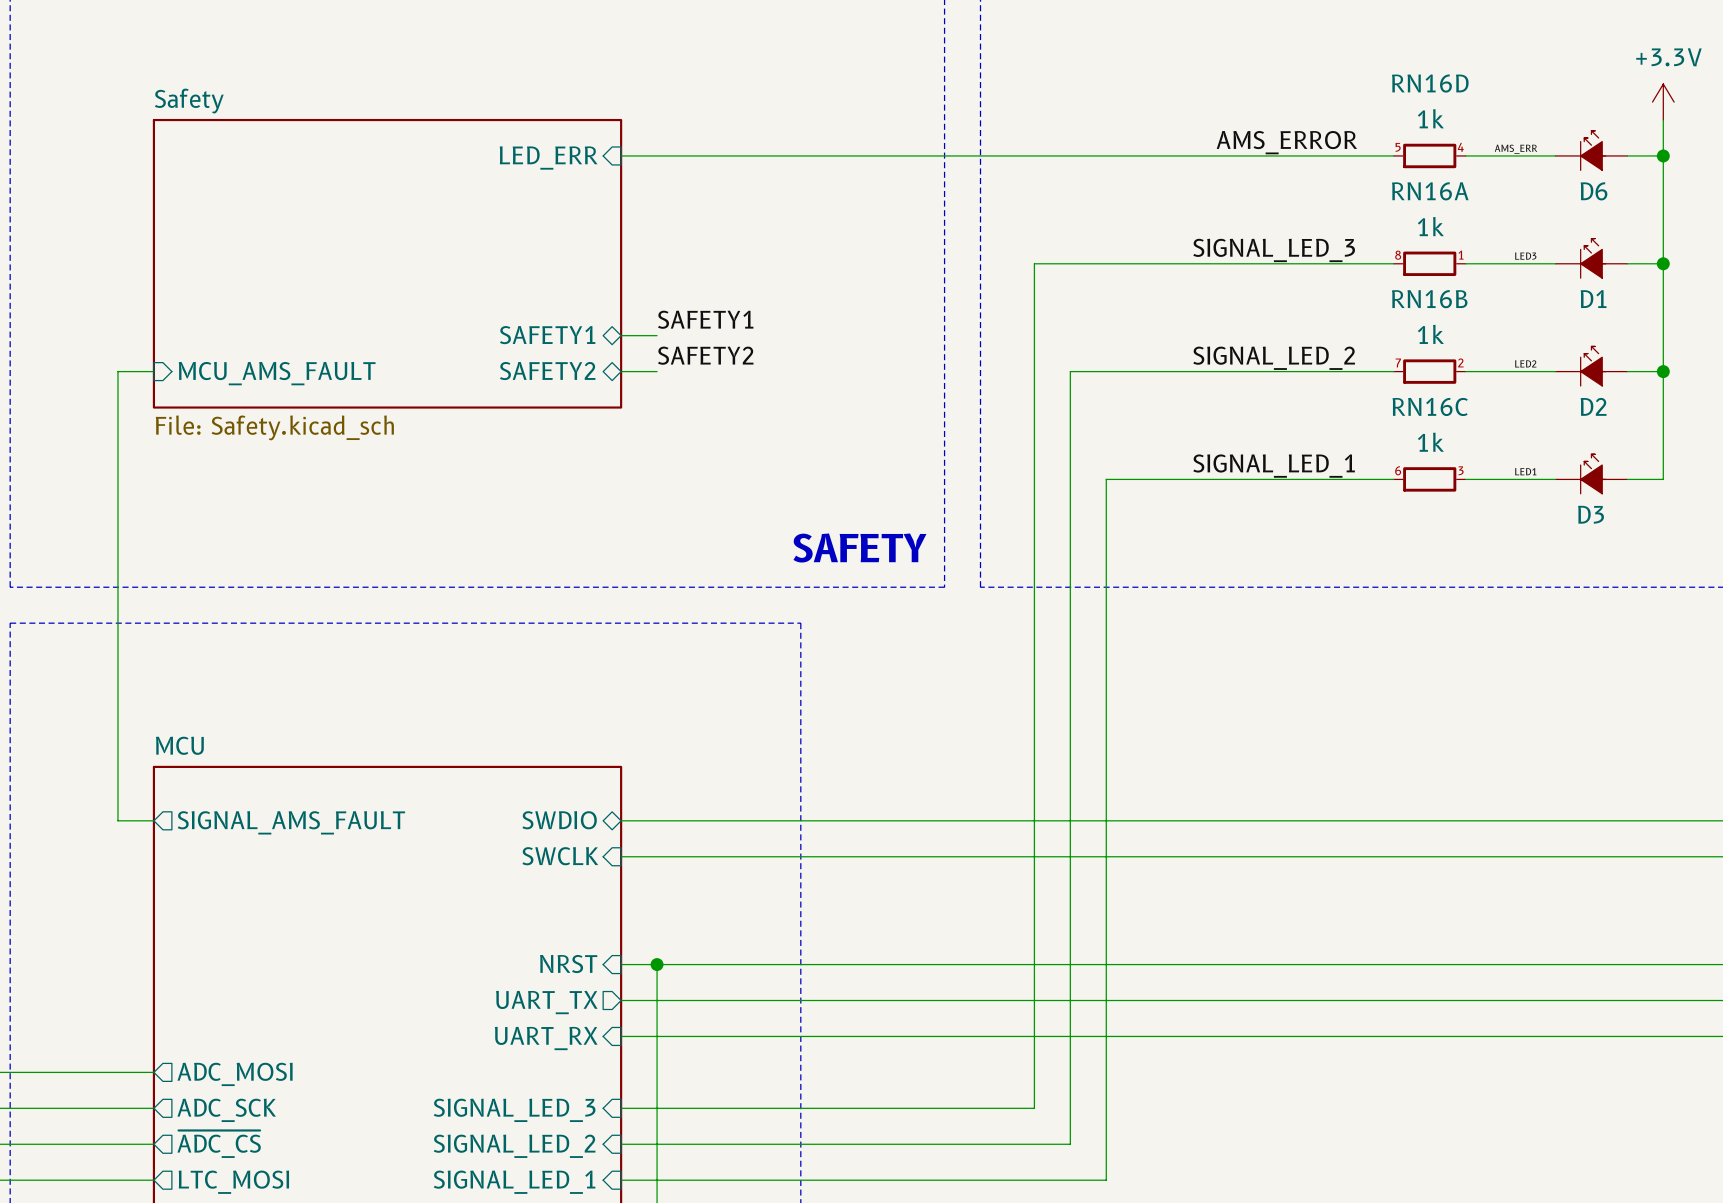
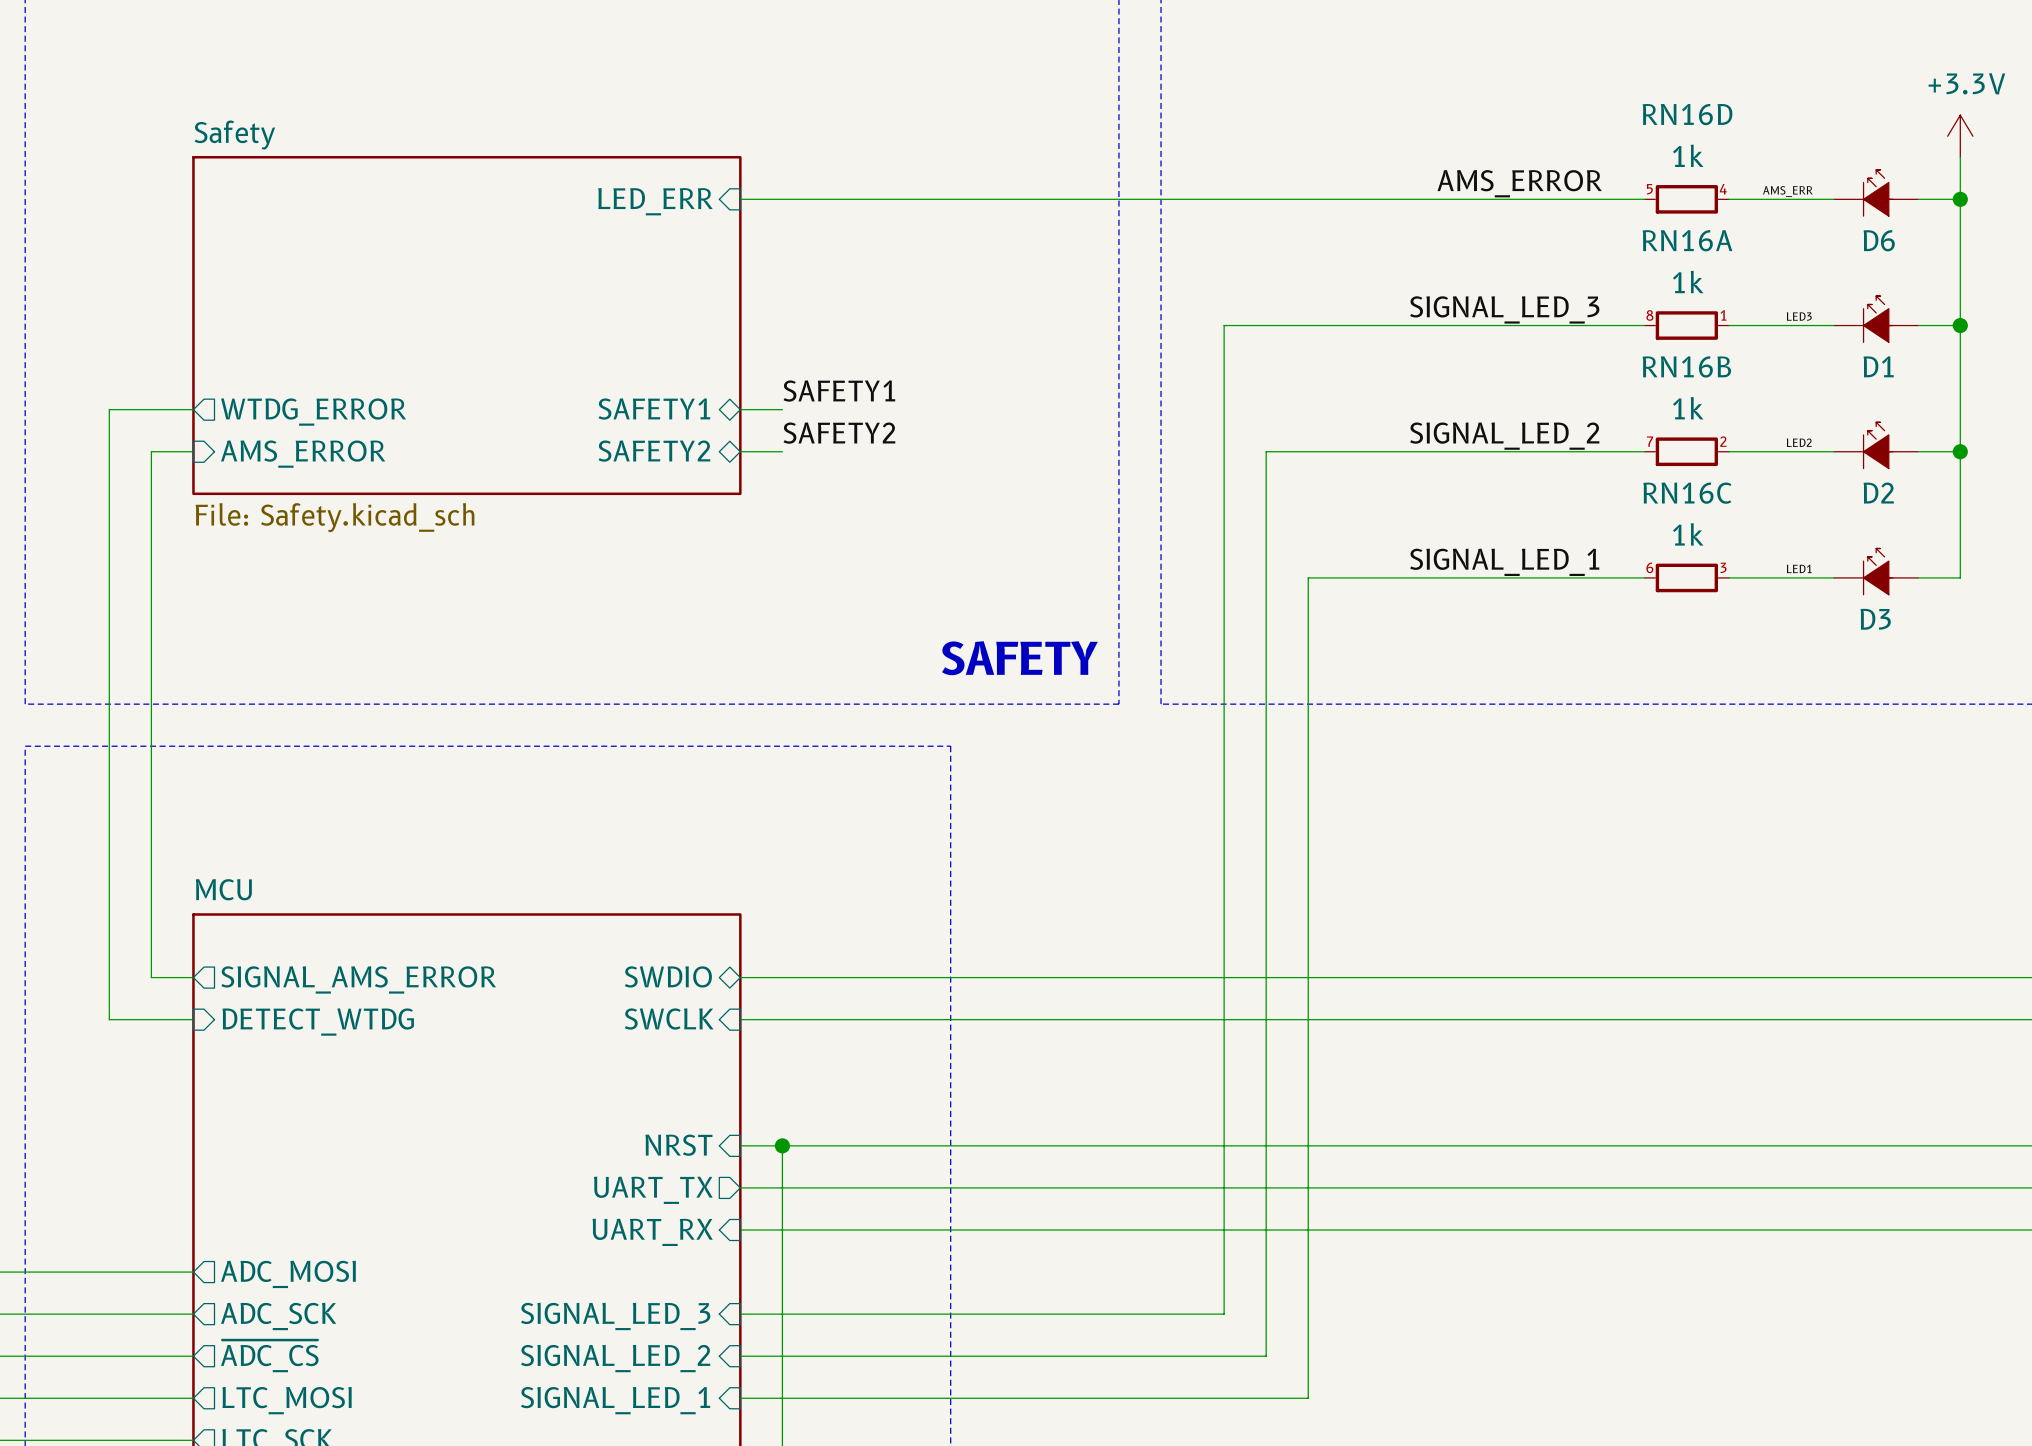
wire: none -> (193, 409) (109, 409) (109, 1019) (193, 1019)
sheet pin: none -> WTDG_ERROR (313, 412)
sheet pin: MCU_AMS_FAULT (277, 373) -> AMS_ERROR (303, 454)
sheet pin: SIGNAL_AMS_FAULT (291, 822) -> SIGNAL_AMS_ERROR (358, 979)
sheet pin: none -> DETECT_WTDG (318, 1022)

